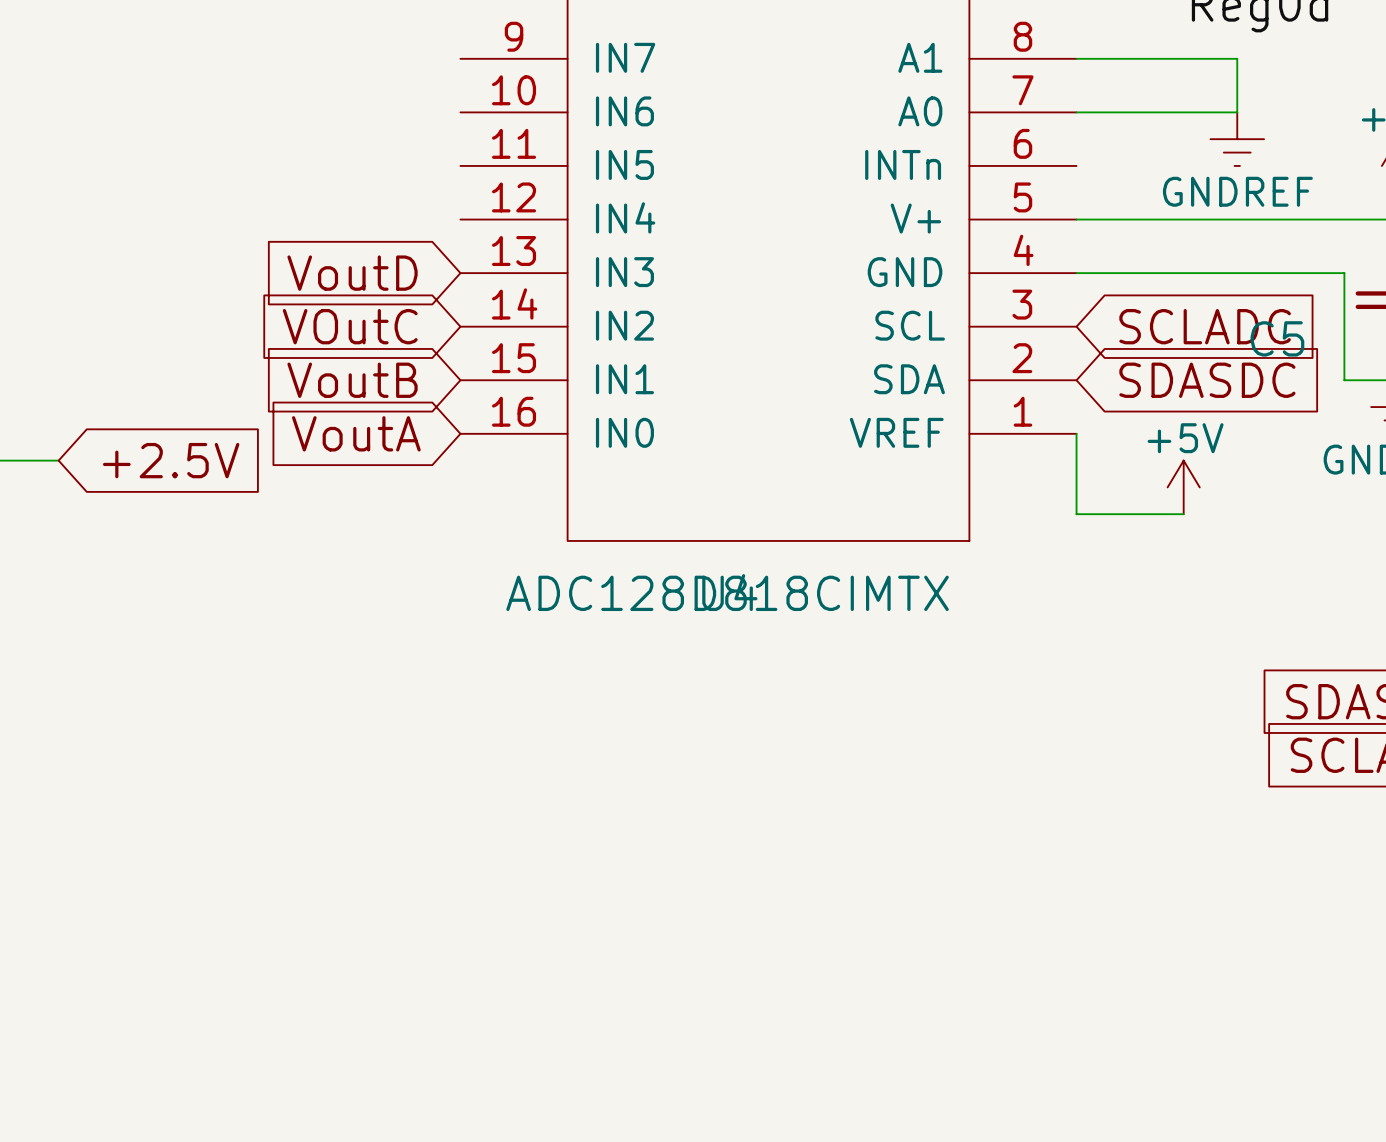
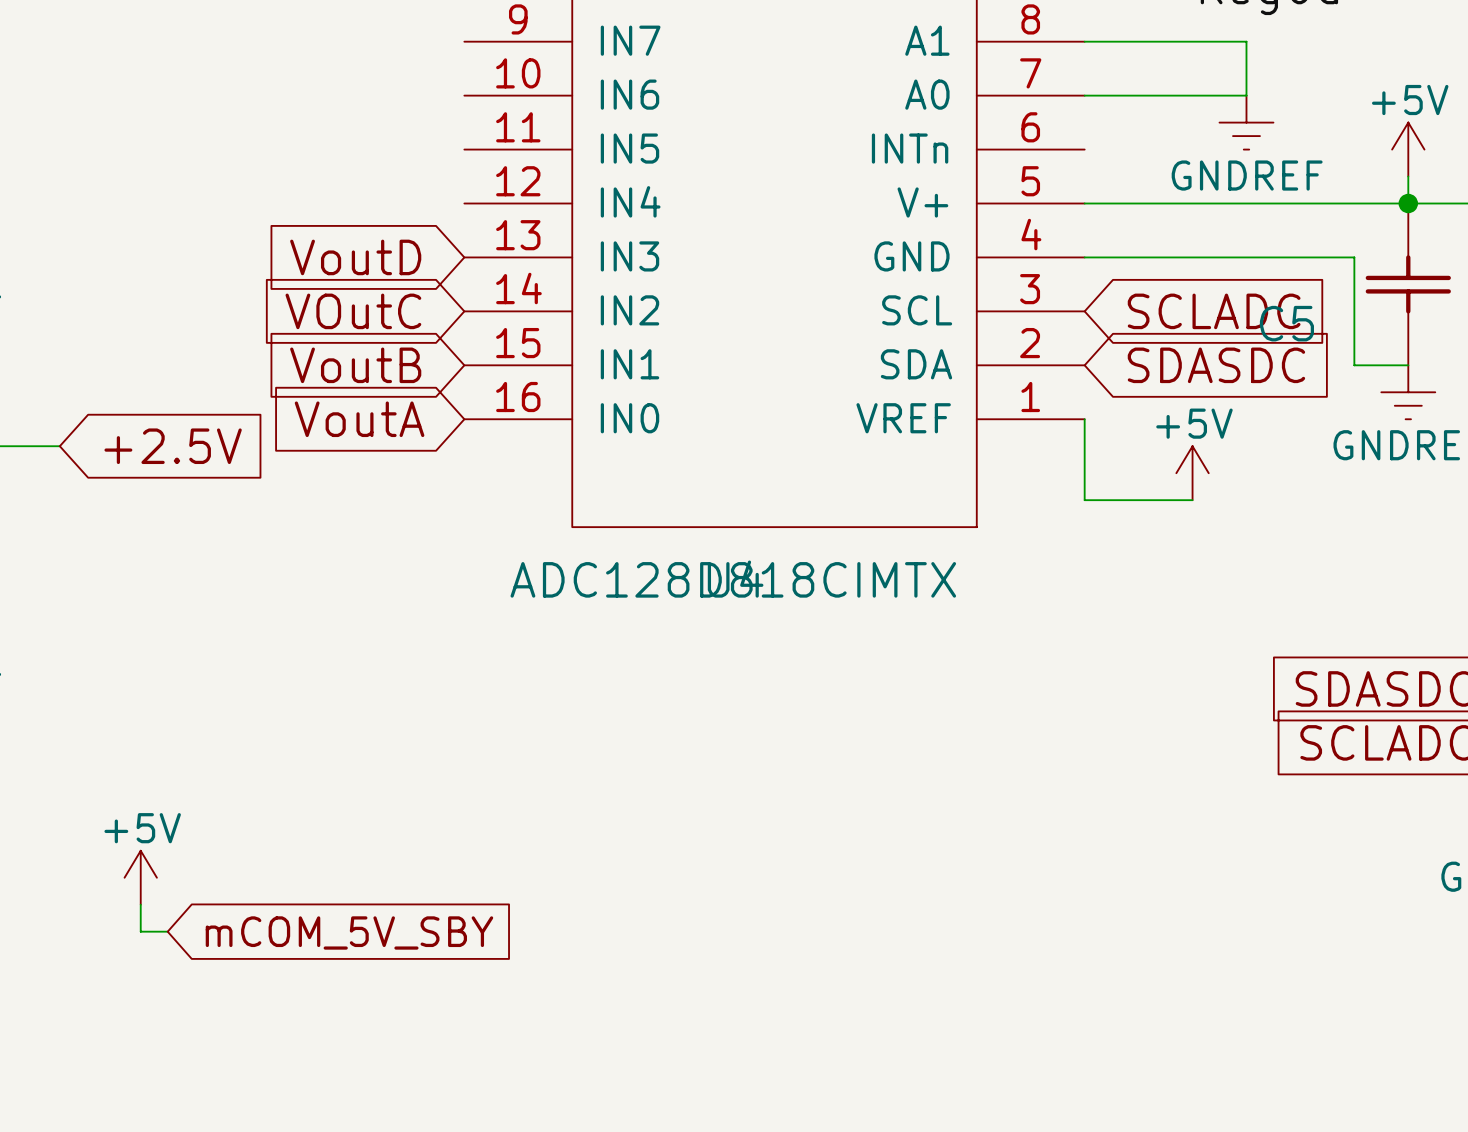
power symbol: none -> +5V (140, 877)
wire: none -> (140, 904) (140, 931) (167, 931)
global label: none -> mCOM_5V_SBY (349, 932)

